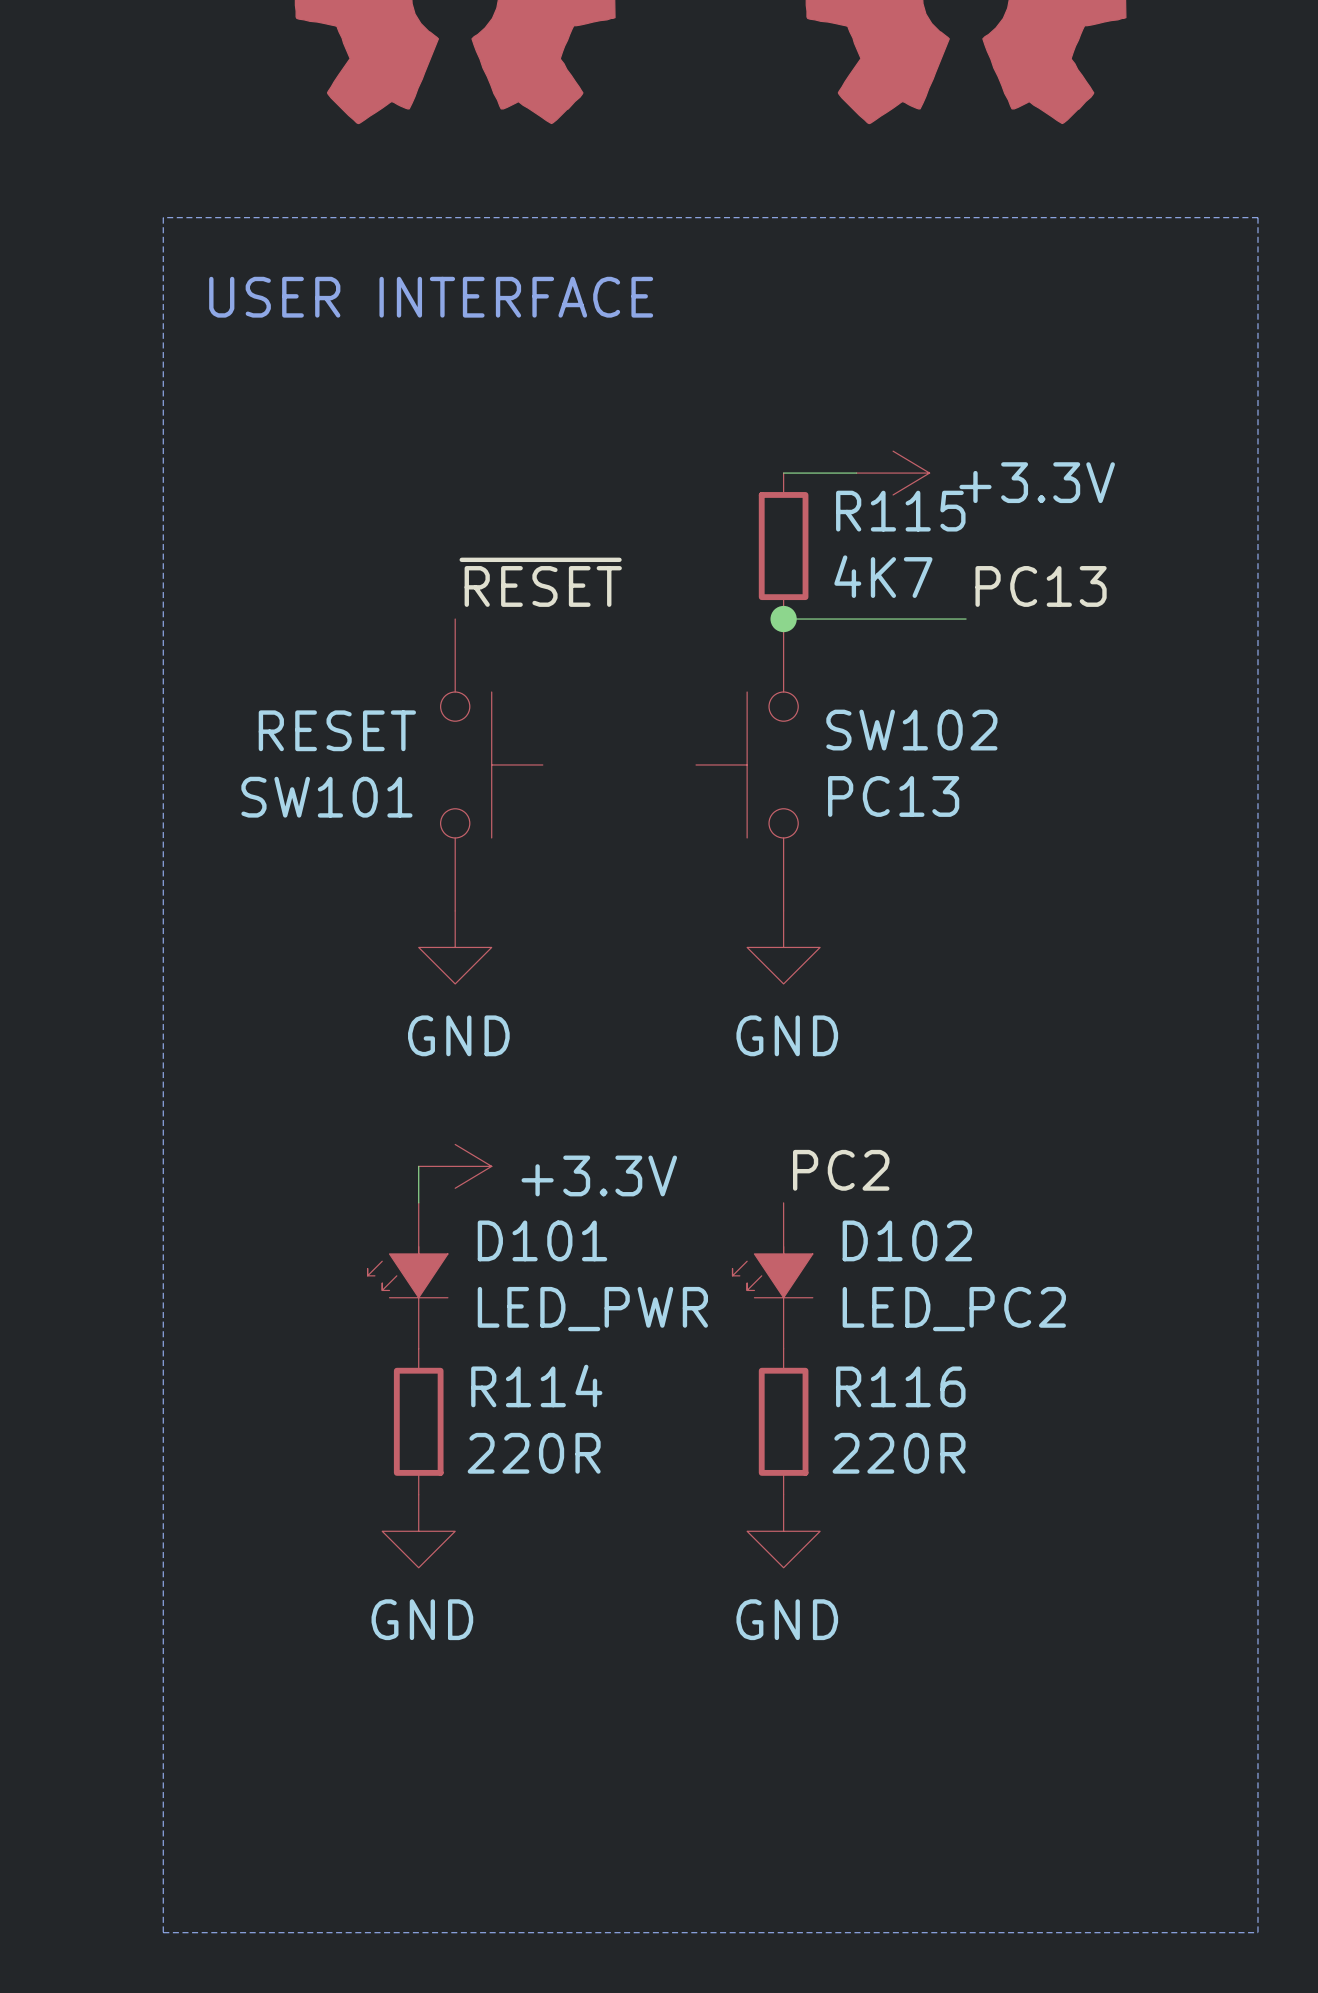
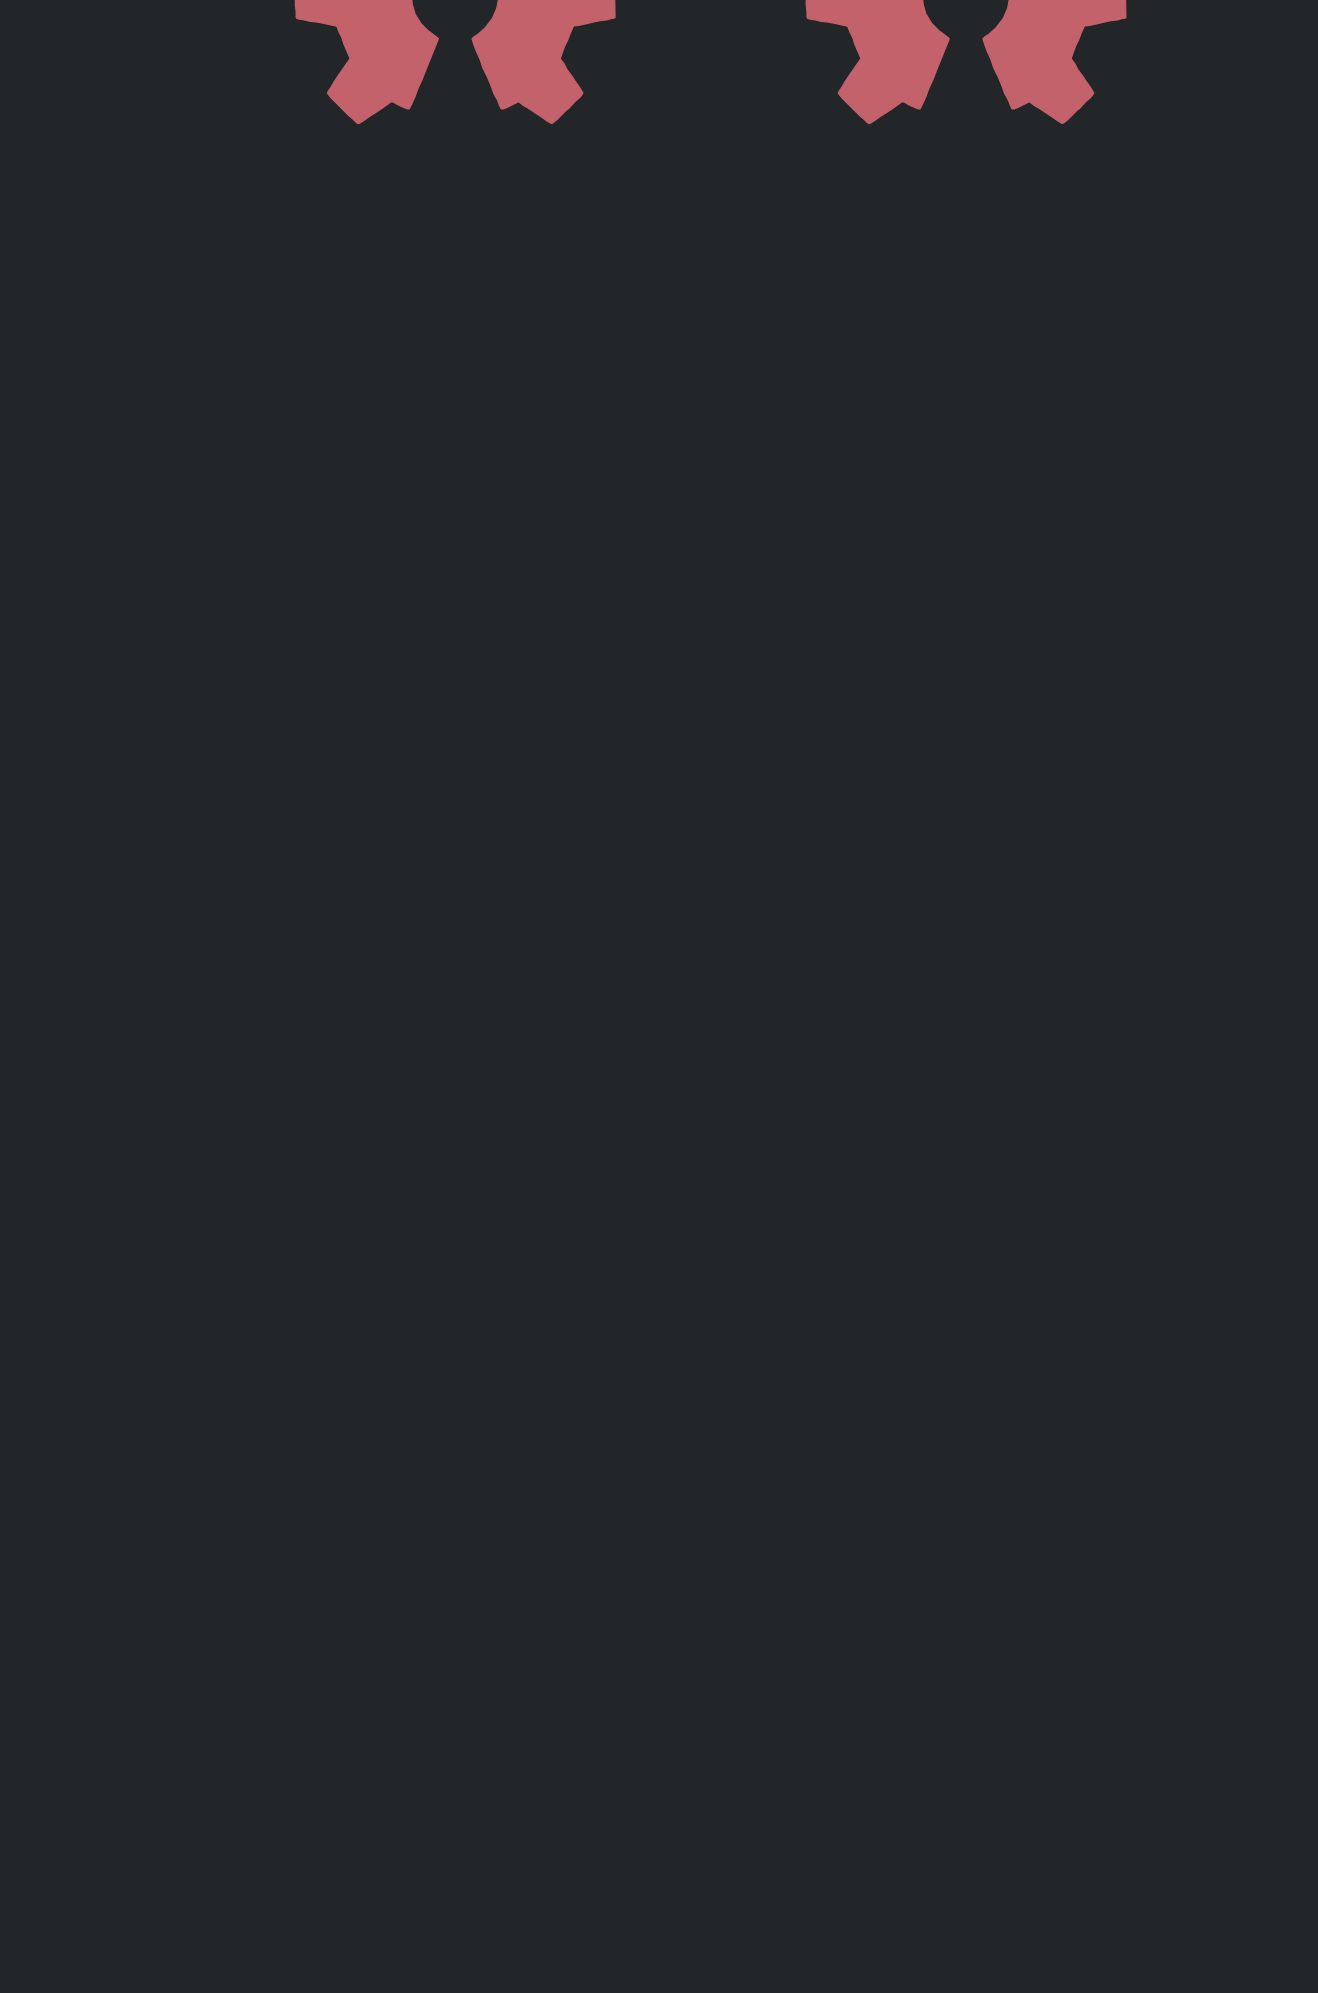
line: (163, 217) (1257, 217) (1257, 1932) (163, 1932) (163, 217) -> none
text: USER INTERFACE (431, 297) -> none
wire: (783, 473) (856, 473) -> none
power symbol: +3.3V (893, 473) -> none
R115: 4K7 (783, 546) -> none
label: ~{RESET} (540, 582) -> none
label: PC13 (1041, 586) -> none
wire: (783, 619) (966, 619) -> none
junction: (783, 619) -> none
SW101: RESET (491, 764) -> none
SW102: PC13 (747, 764) -> none
power symbol: GND (455, 947) -> none
power symbol: GND (783, 947) -> none
wire: (418, 1166) (418, 1202) -> none
power symbol: +3.3V (455, 1166) -> none
label: PC2 (841, 1170) -> none
D101: LED_PWR (407, 1275) -> none
D102: LED_PC2 (772, 1275) -> none
R114: 220R (418, 1421) -> none
R116: 220R (783, 1421) -> none
power symbol: GND (418, 1531) -> none
power symbol: GND (783, 1531) -> none

